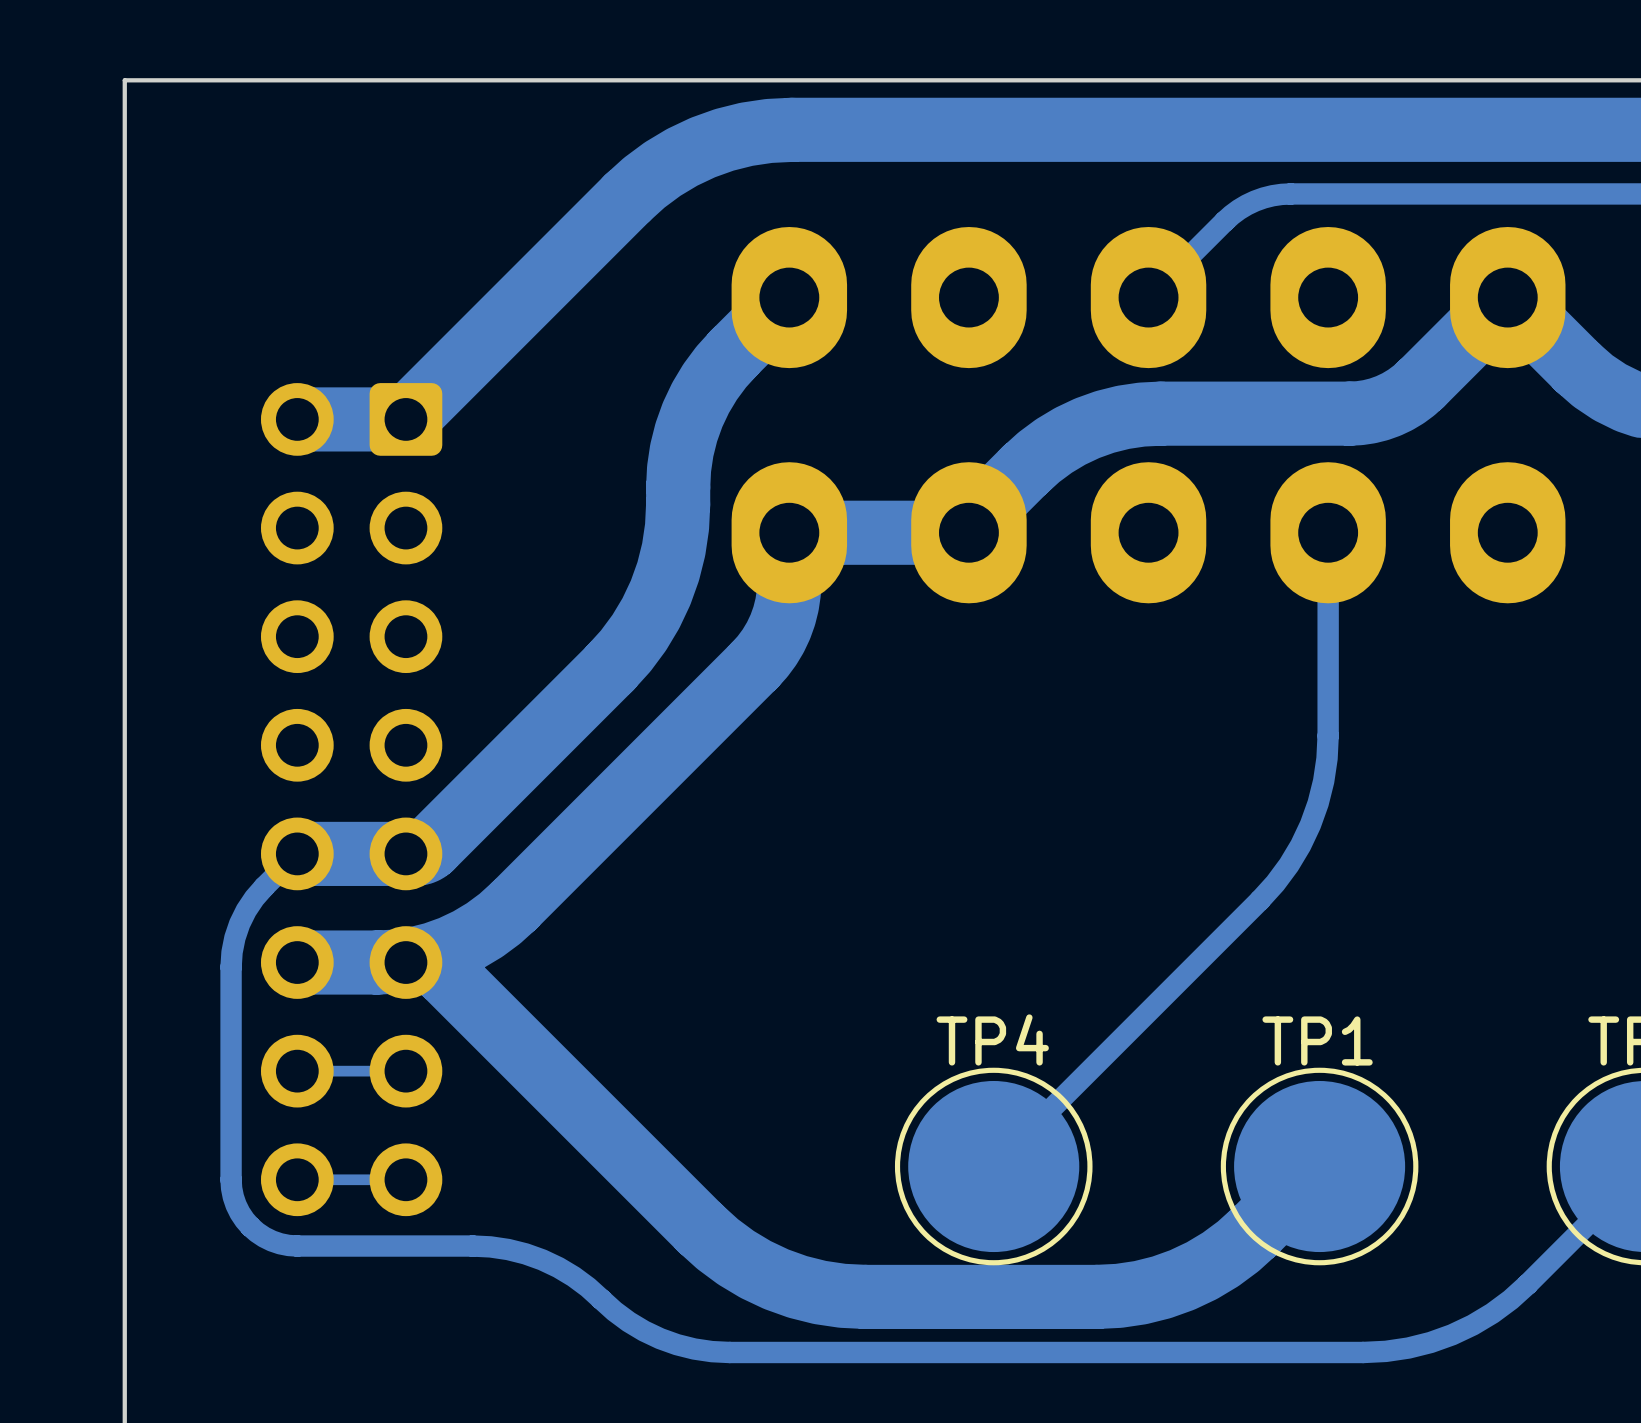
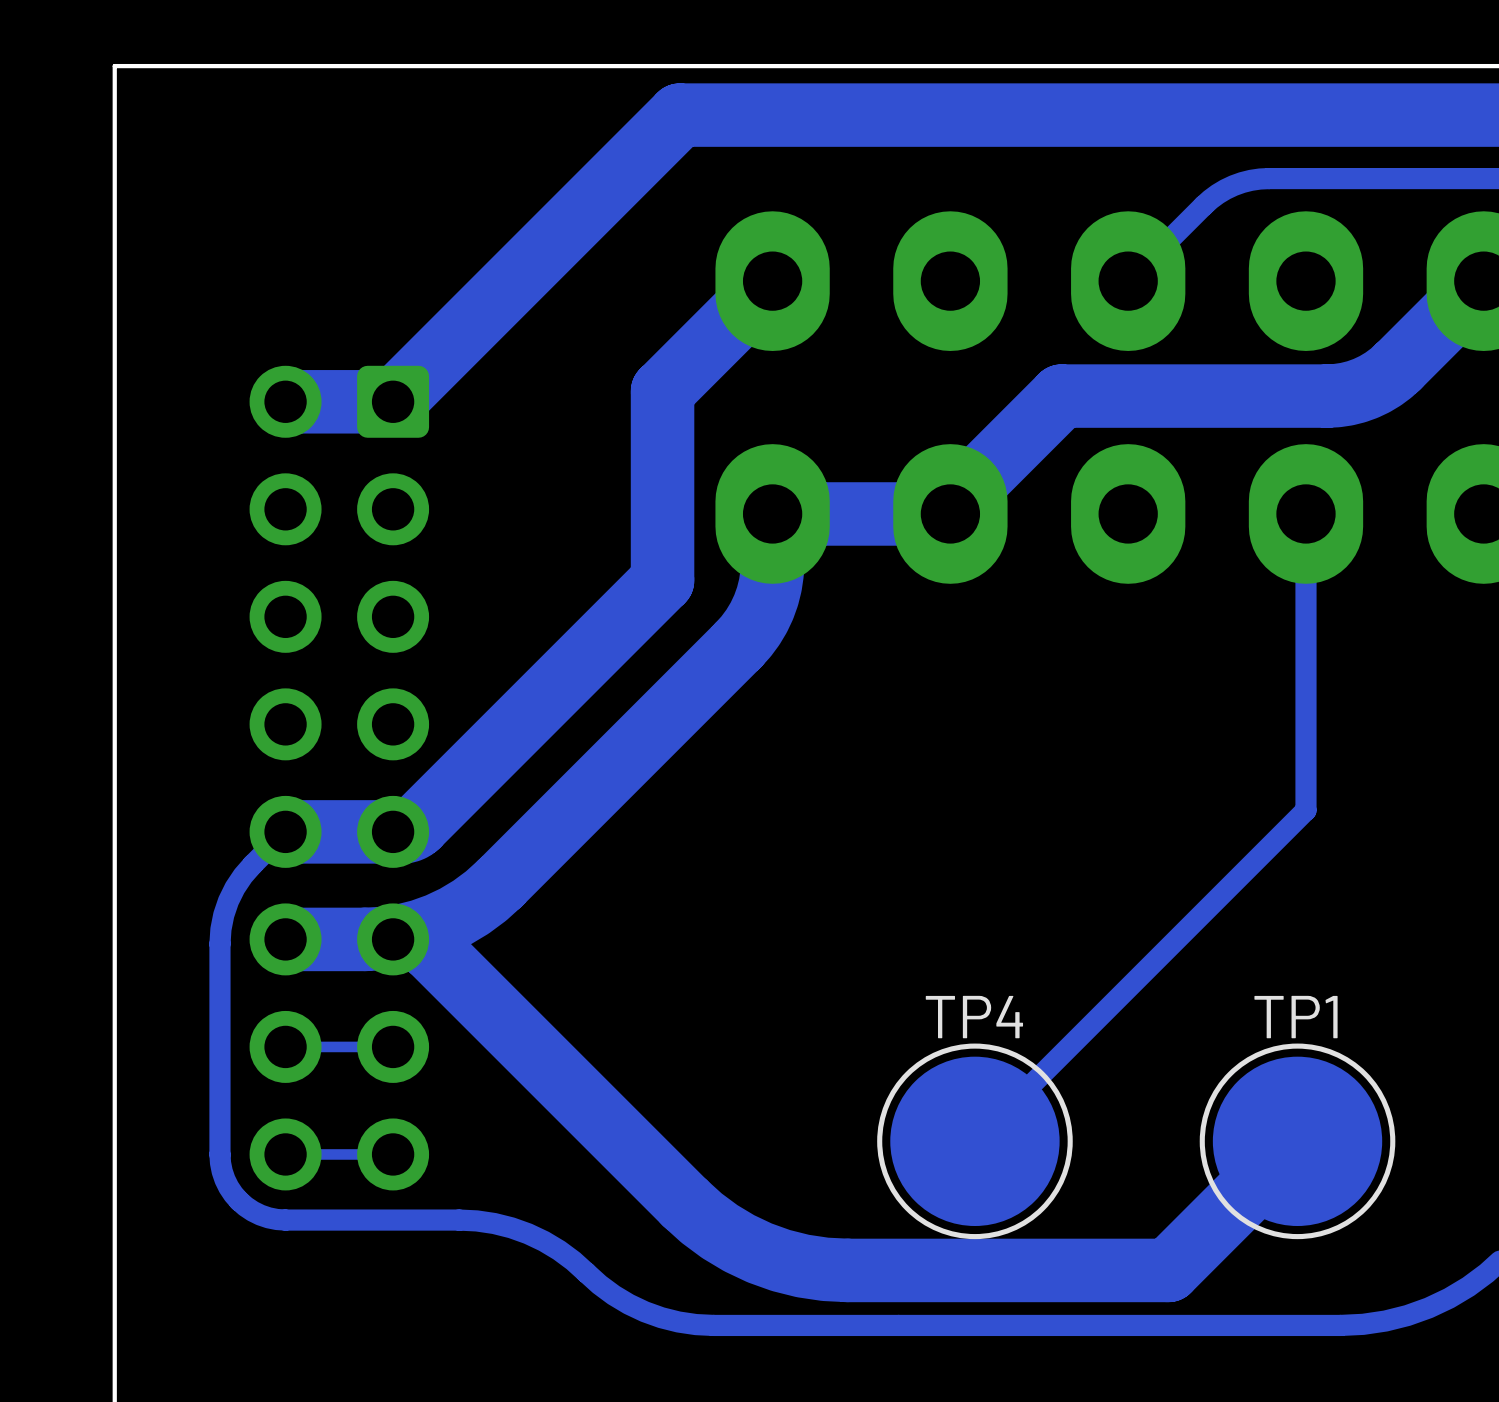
bottom track: (791, 129) (746, 134) (702, 147) (662, 169) (627, 197) -> (775, 115) (679, 115) (612, 182)
bottom track: (733, 353) (710, 381) (692, 414) (681, 450) (678, 487) -> (717, 336) (662, 391) (662, 469)
bottom track: (1160, 413) (1123, 417) (1087, 428) (1054, 445) (1025, 469) -> (1140, 396) (1061, 396) (1005, 451)
bottom track: (678, 504) (673, 549) (660, 592) (639, 632) (610, 667) -> (662, 485) (662, 580) (595, 647)
bottom track: (1328, 735) (1323, 781) (1310, 824) (1288, 864) (1259, 900) -> (1305, 714) (1305, 810) (1238, 877)
bottom track: (1254, 1231) (1220, 1259) (1182, 1279) (1140, 1292) (1096, 1296) -> (1232, 1205) (1168, 1270) (1077, 1270)

